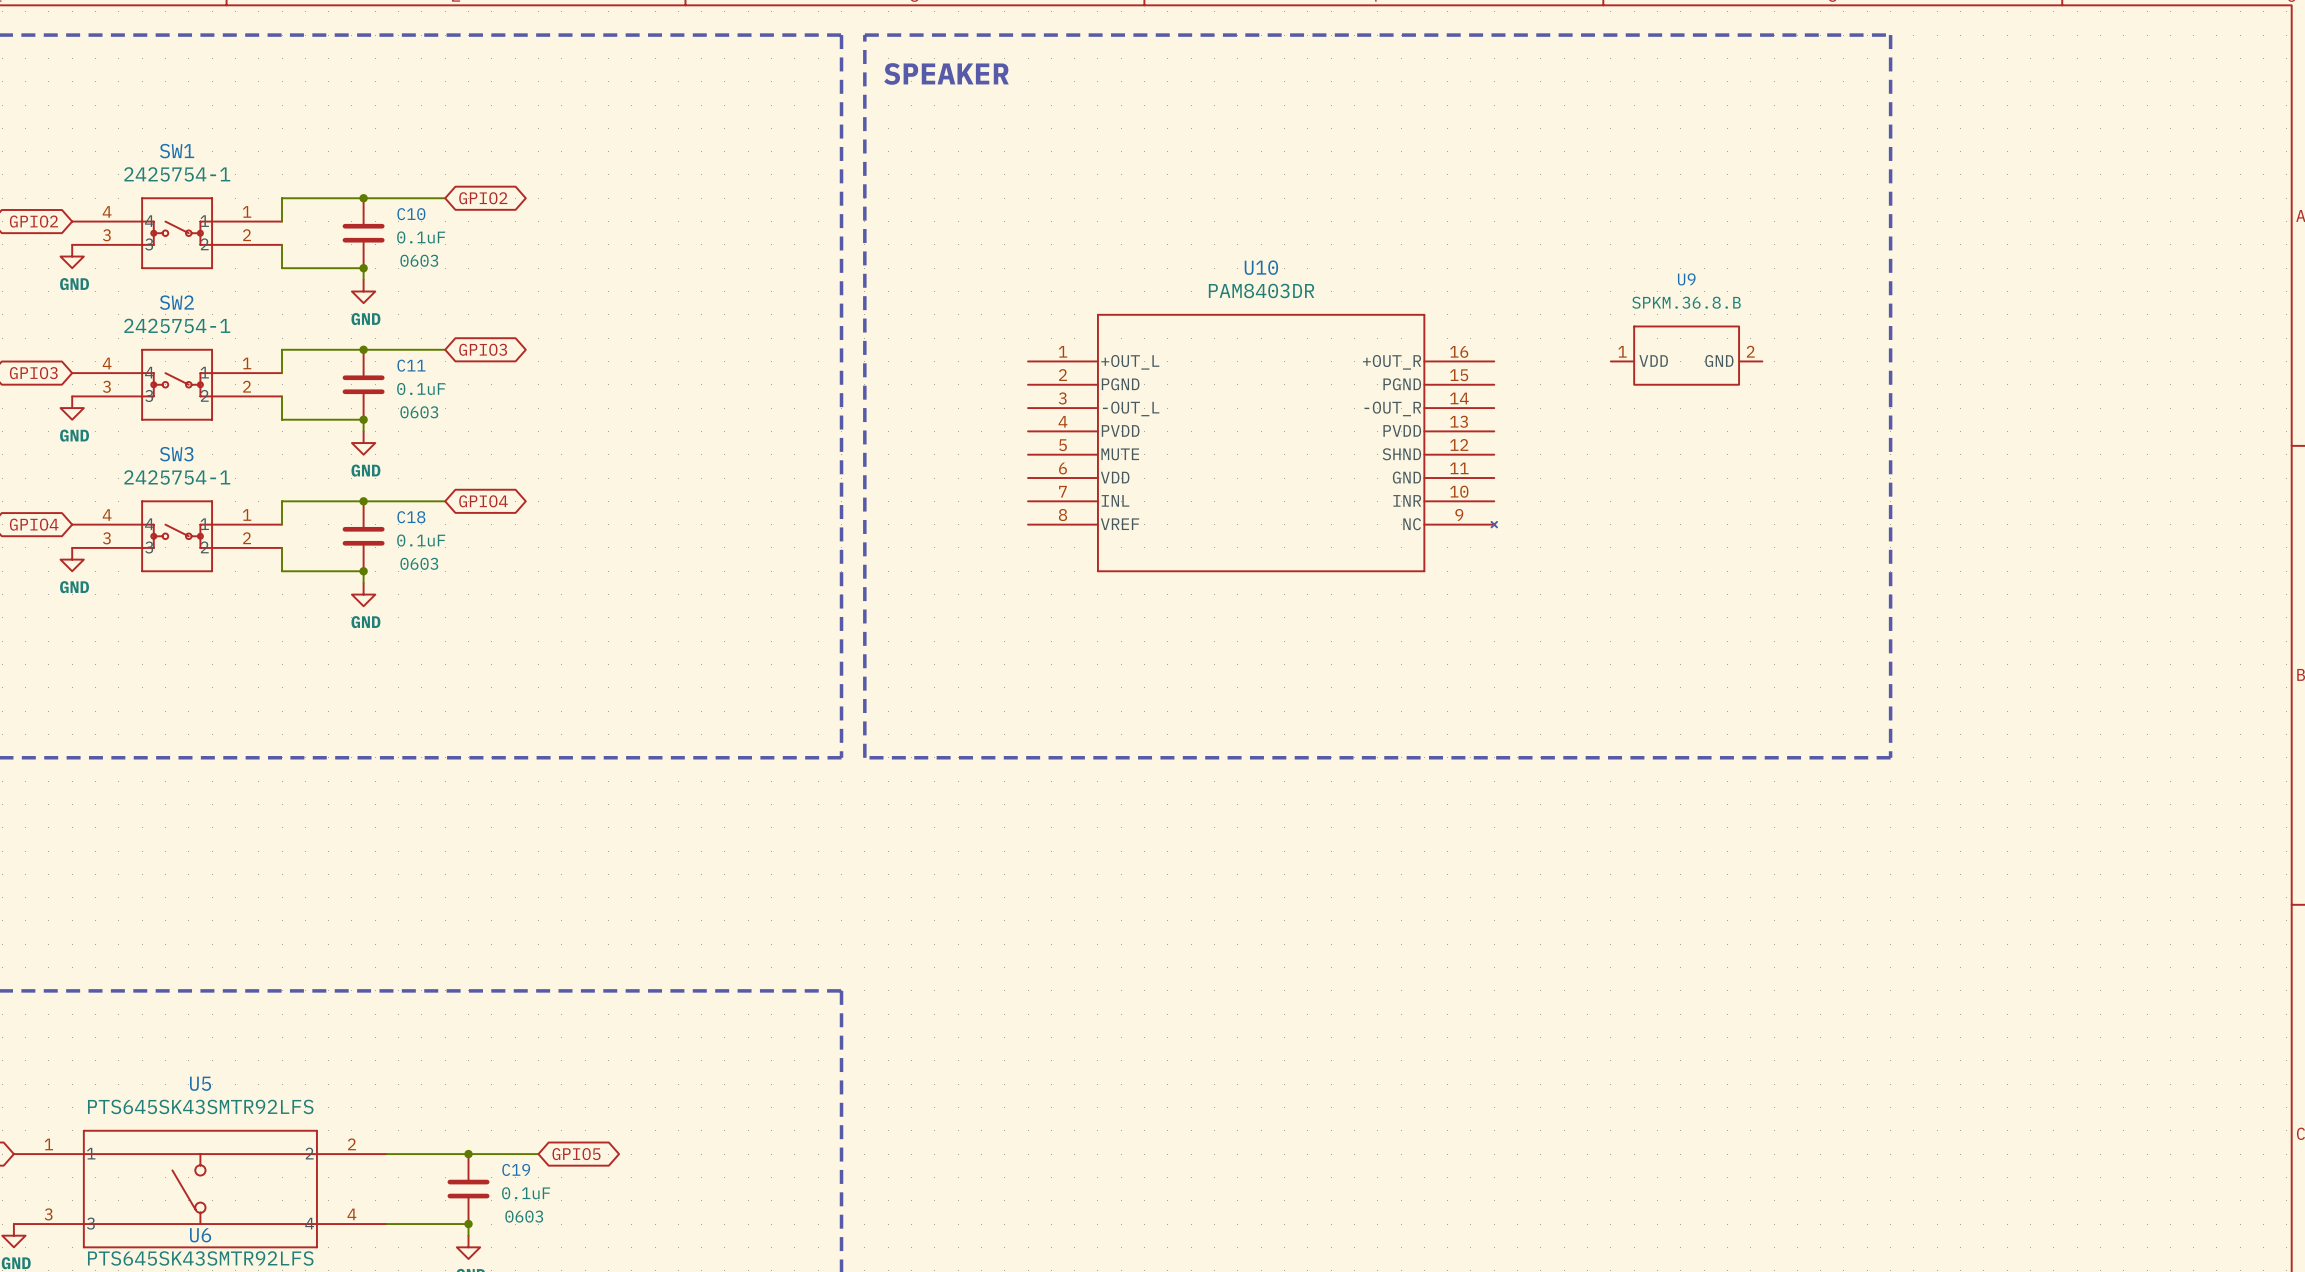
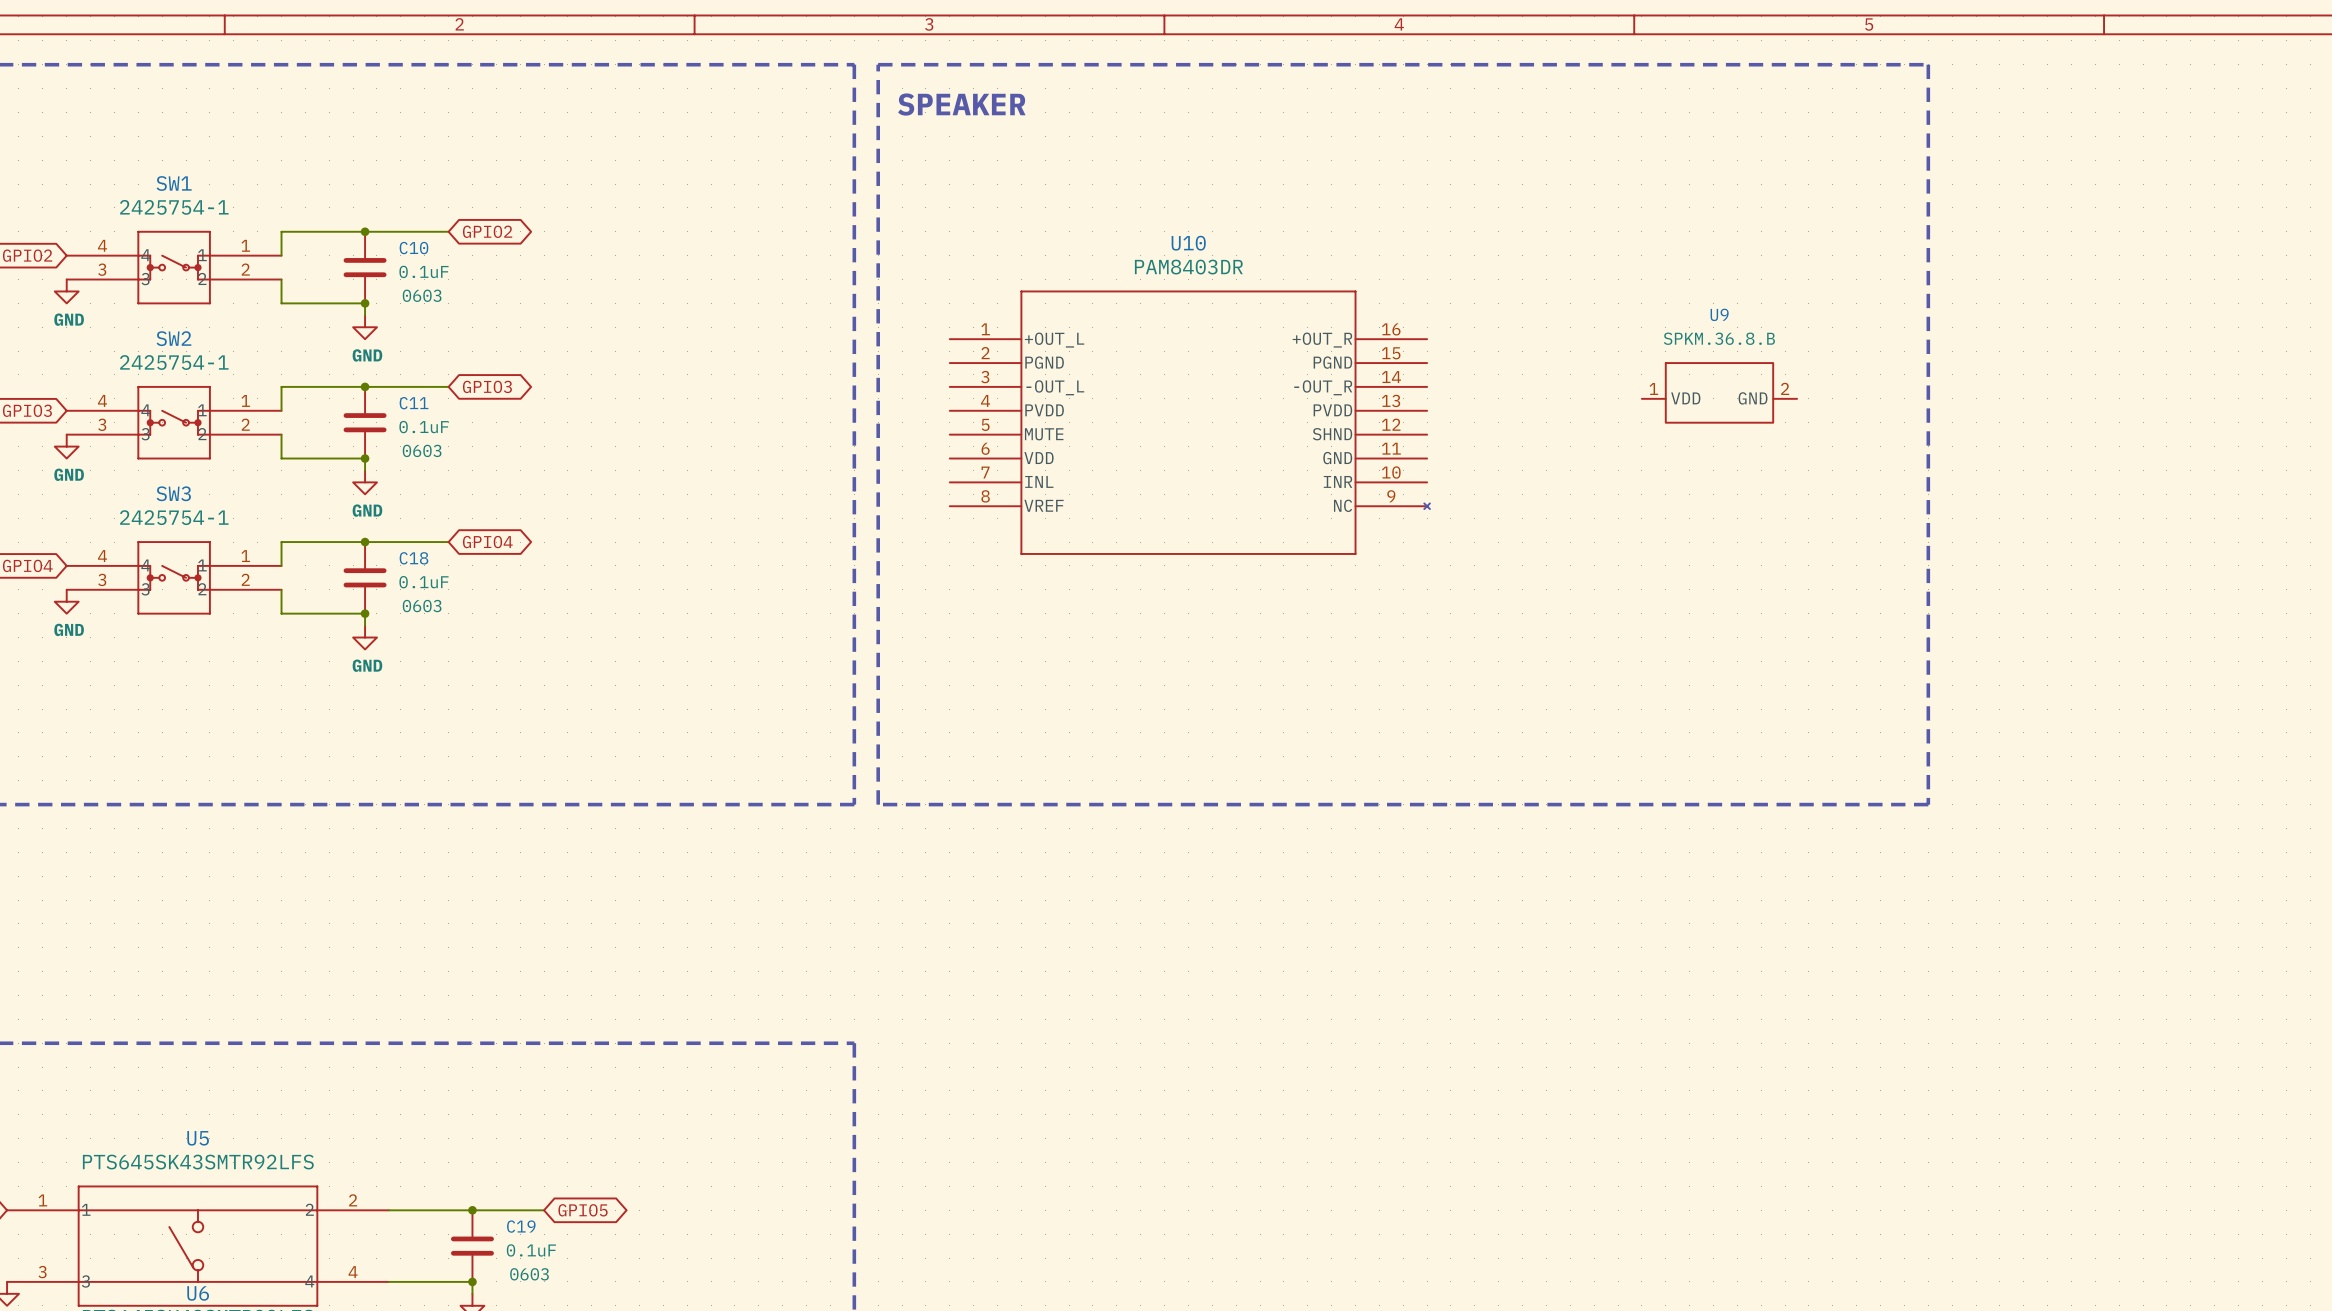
U10 position: (1262, 443) -> (1189, 422)

